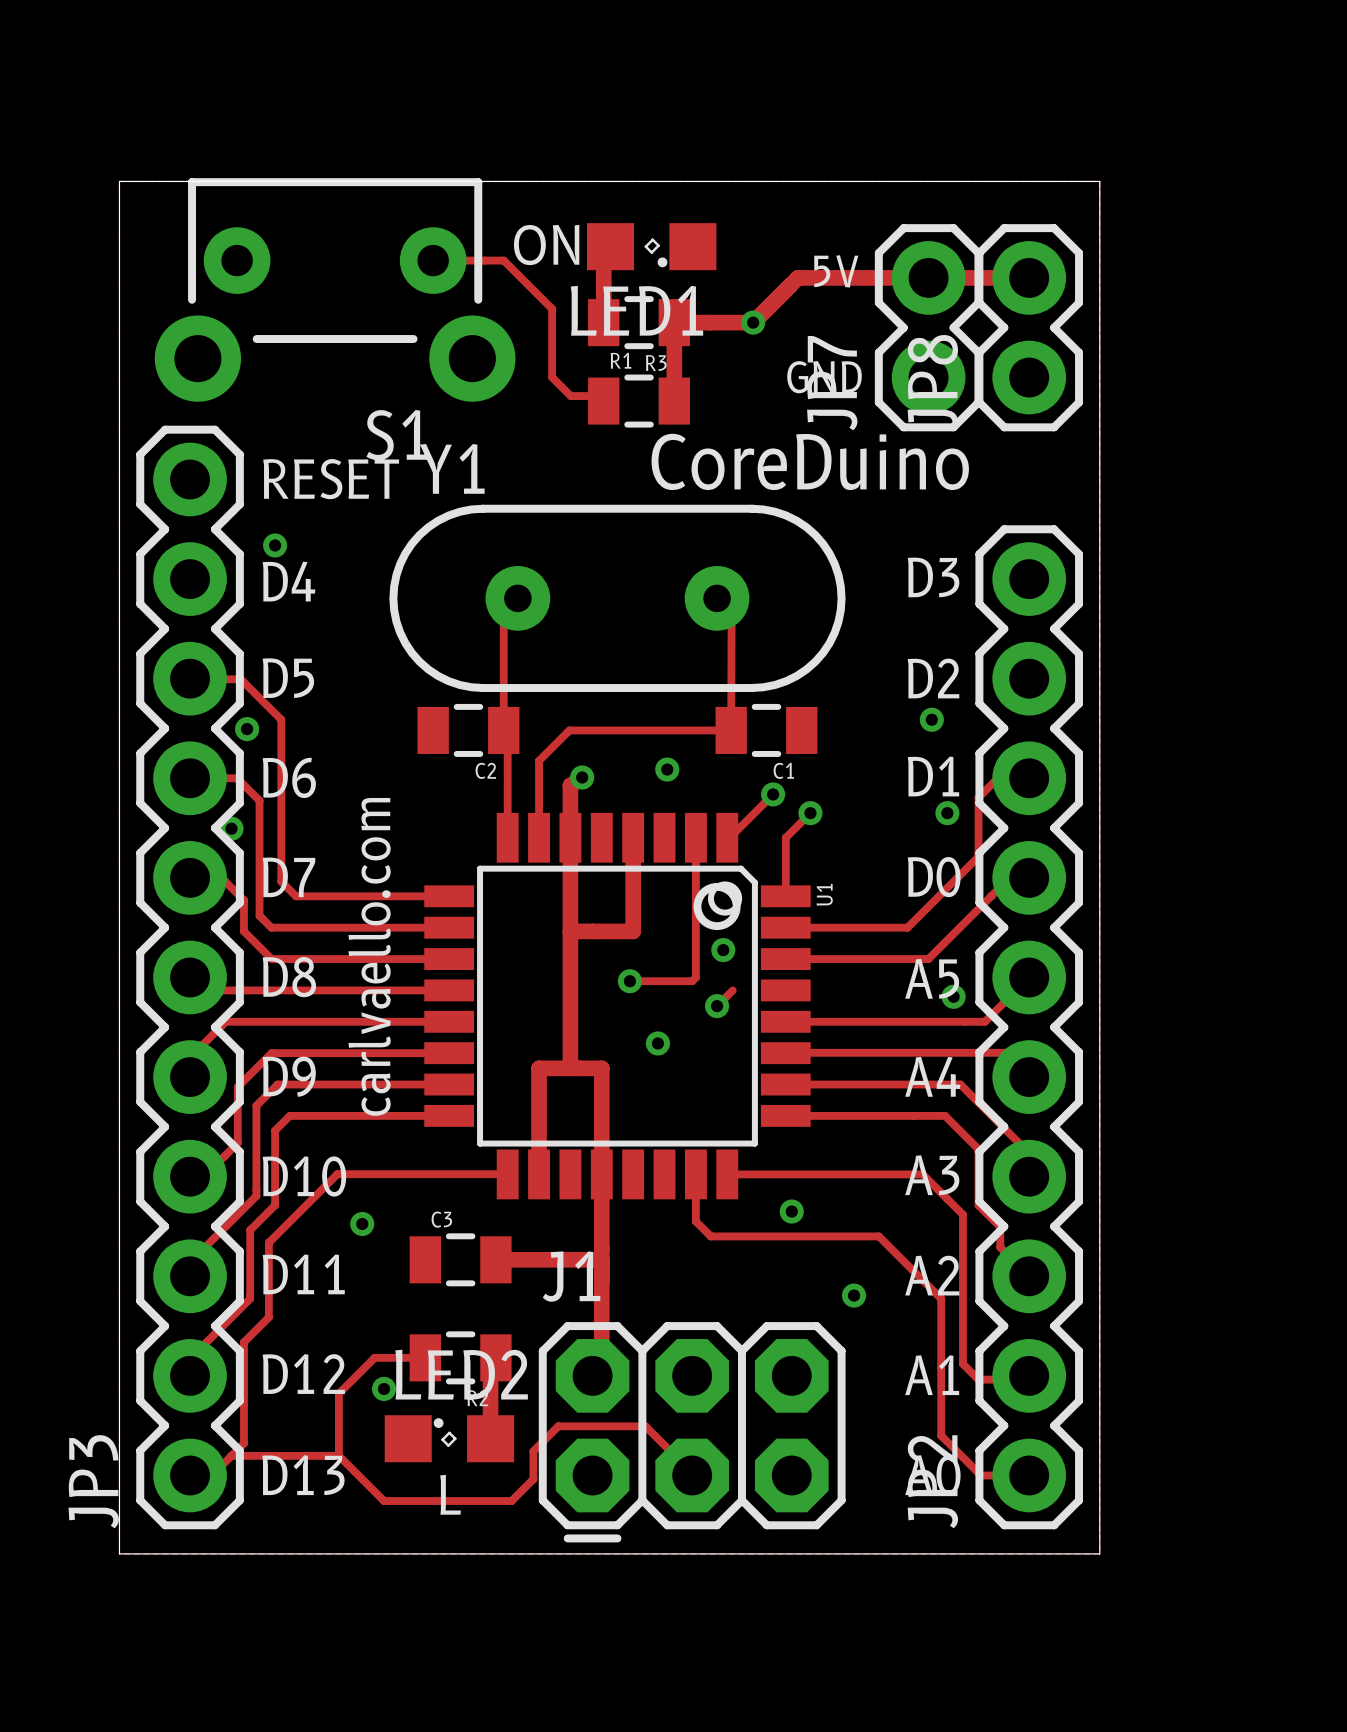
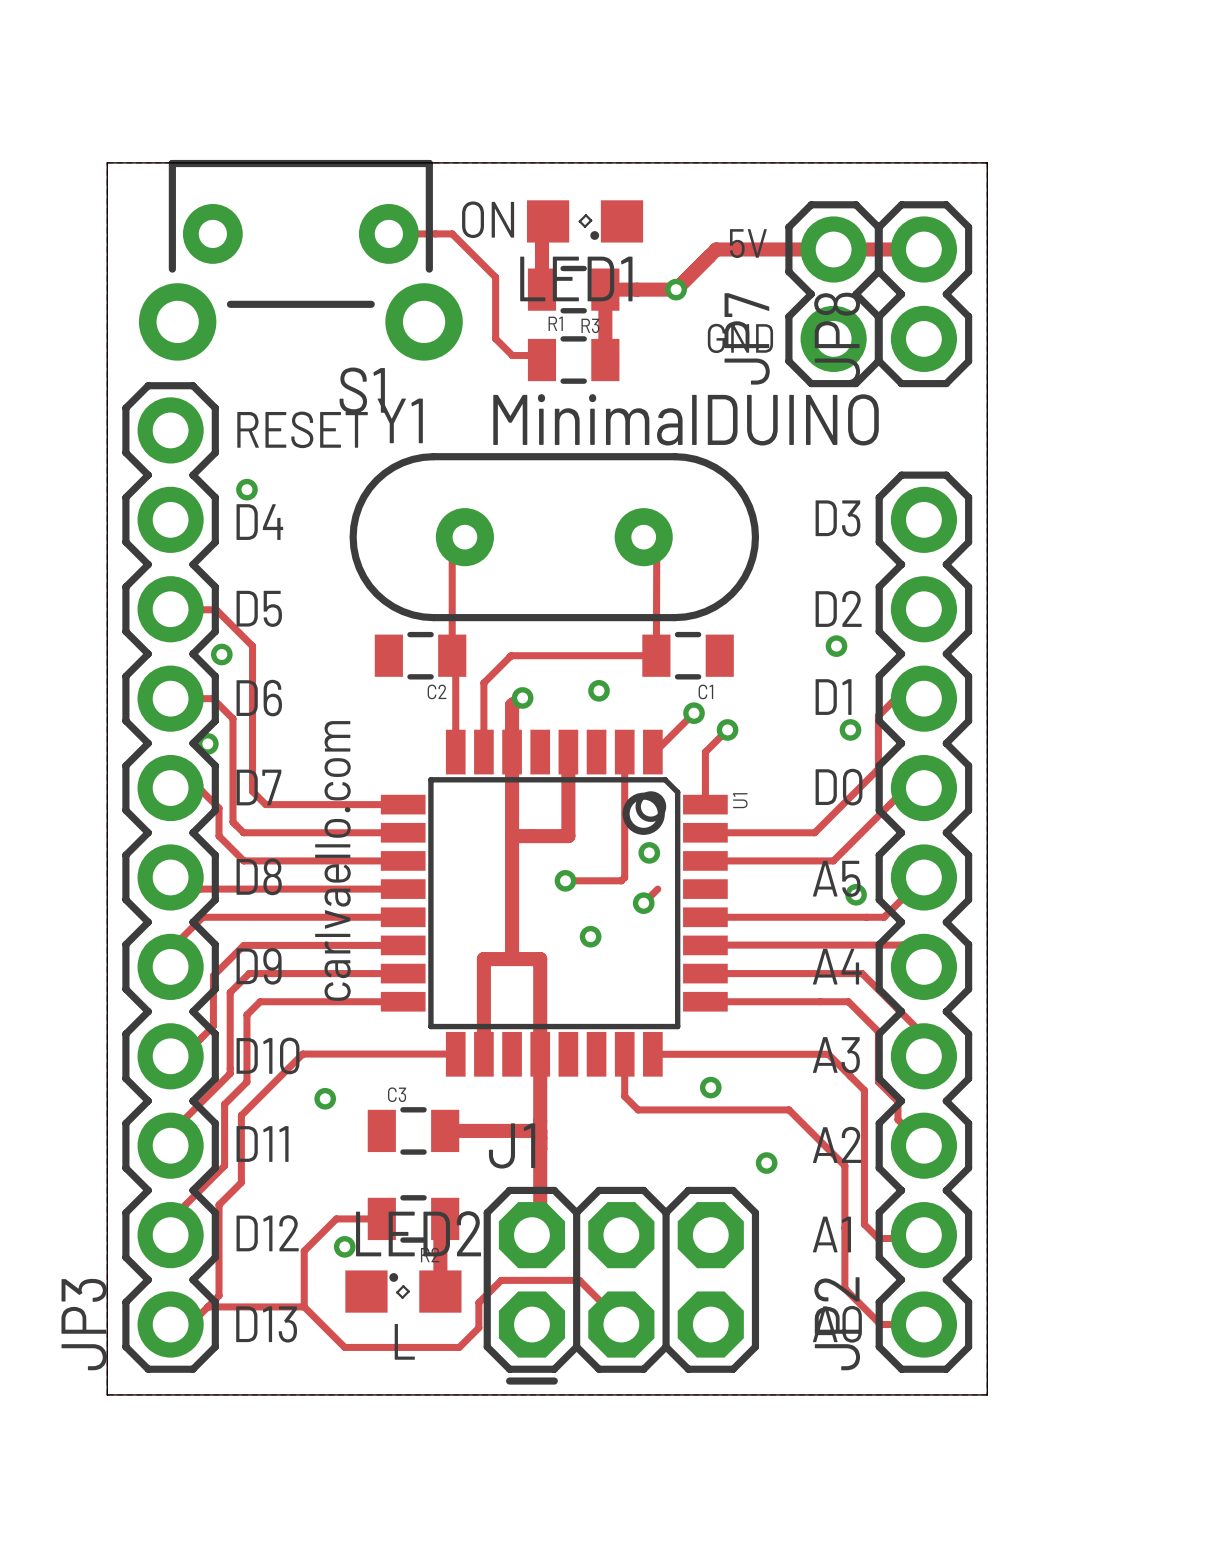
text: CoreDuino (810, 461) -> none
text: none -> MinimalDUINO (686, 419)

